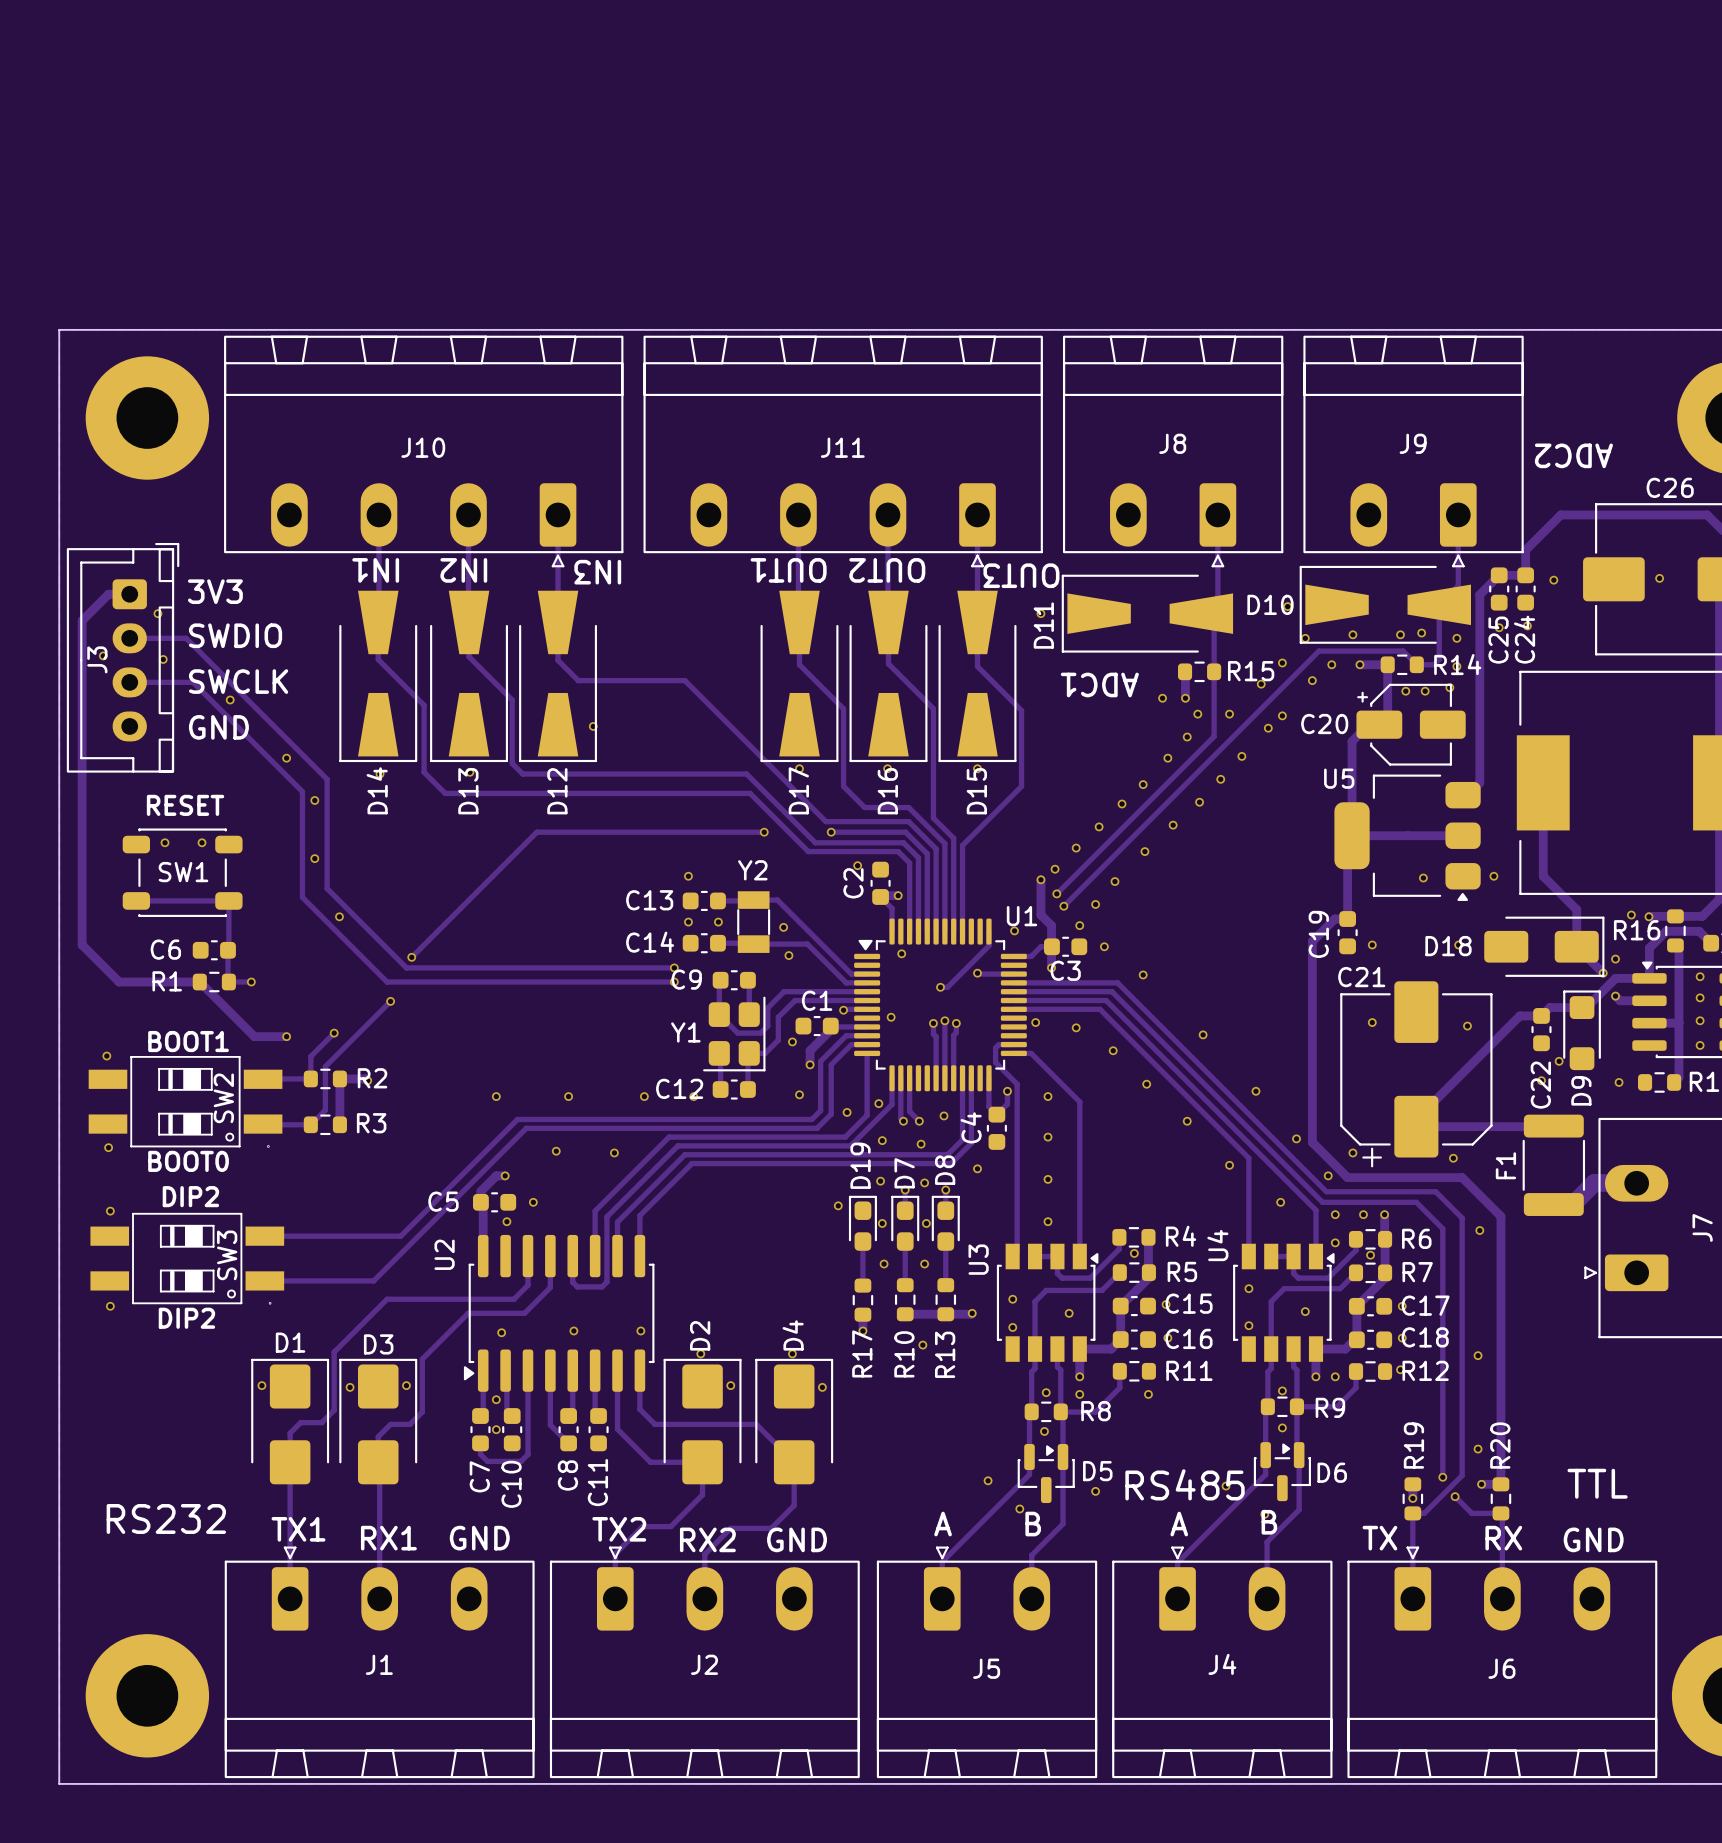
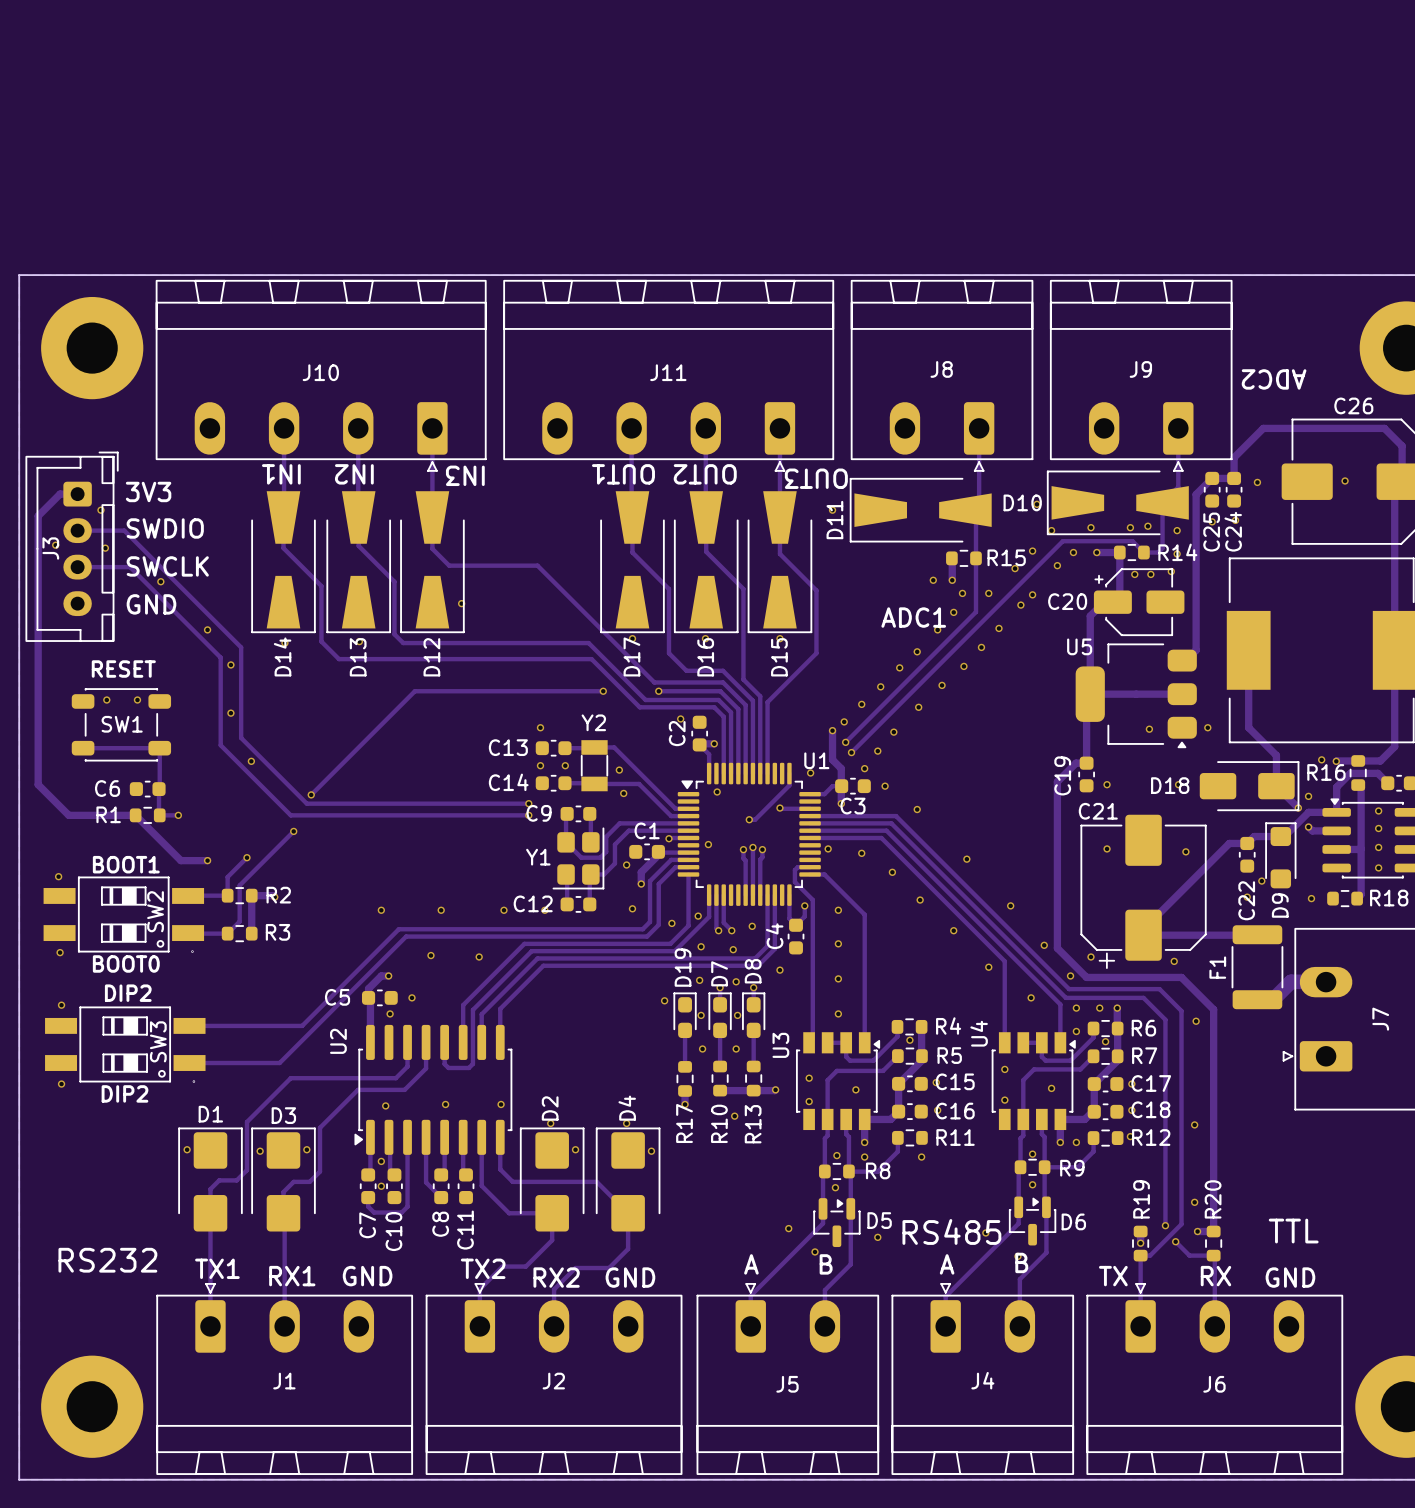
text rotation: 0° (1099, 684) -> 180° (913, 617)

